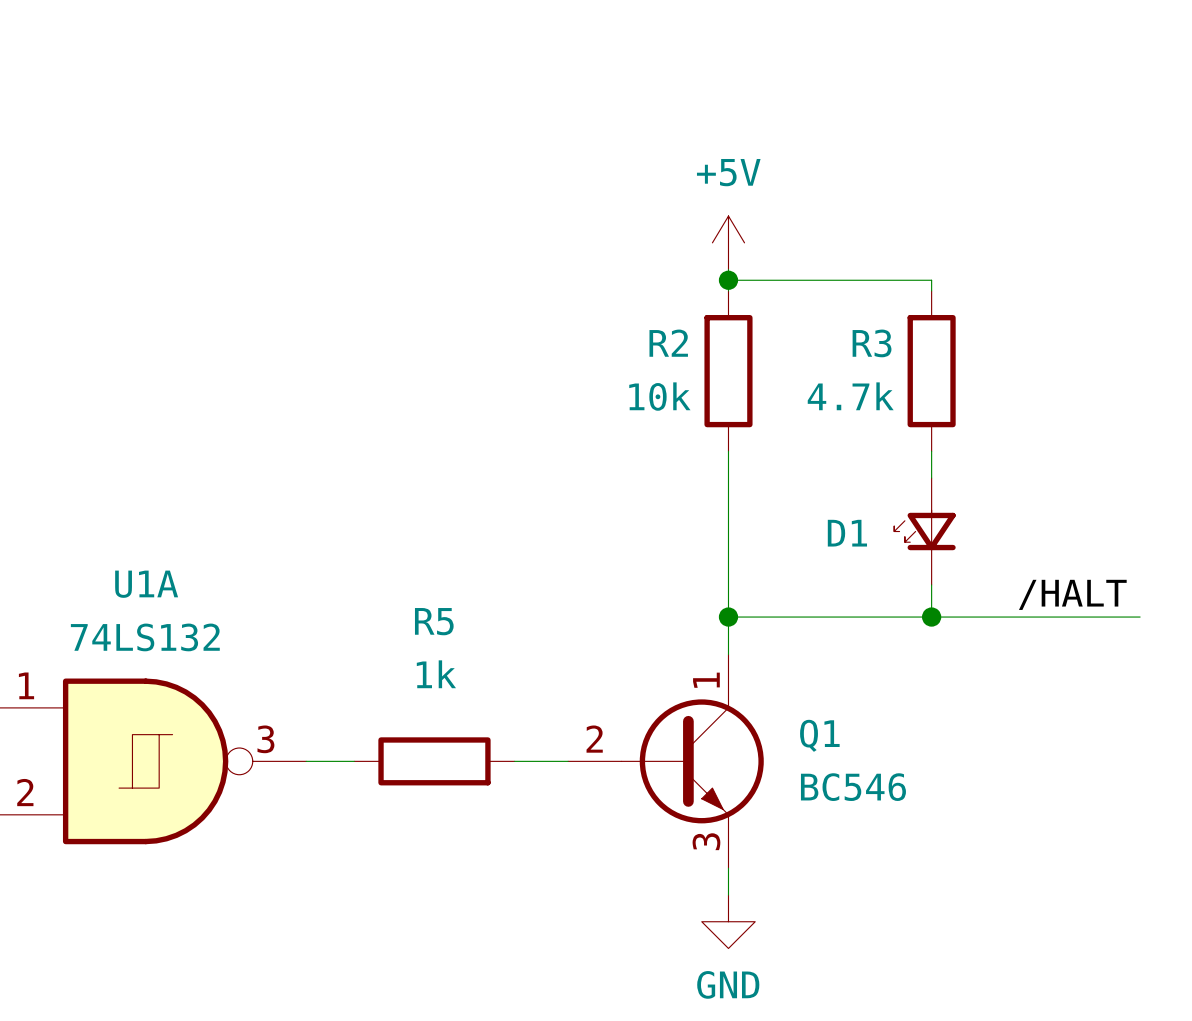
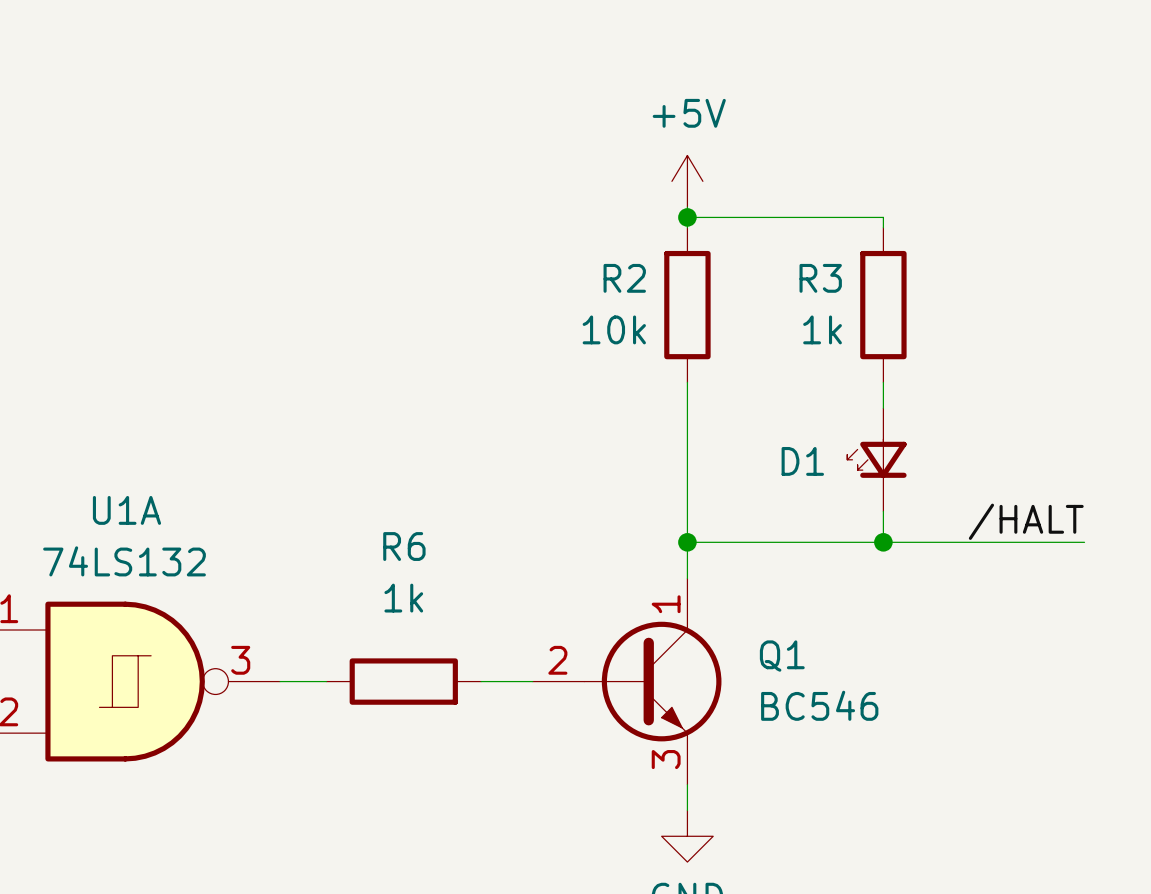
R3 value: 4.7k (850, 396) -> 1k (822, 329)
R5 name: R5 (434, 621) -> R6 (404, 546)

